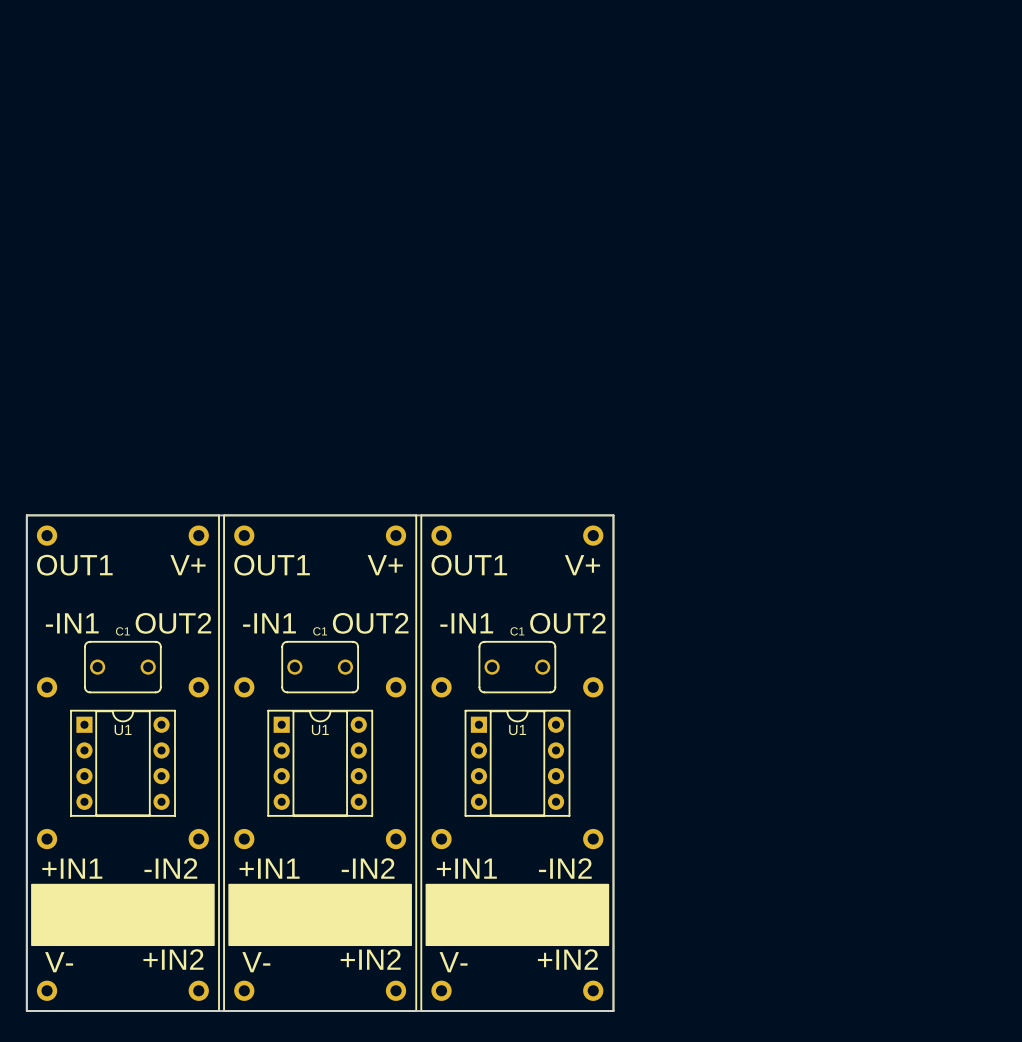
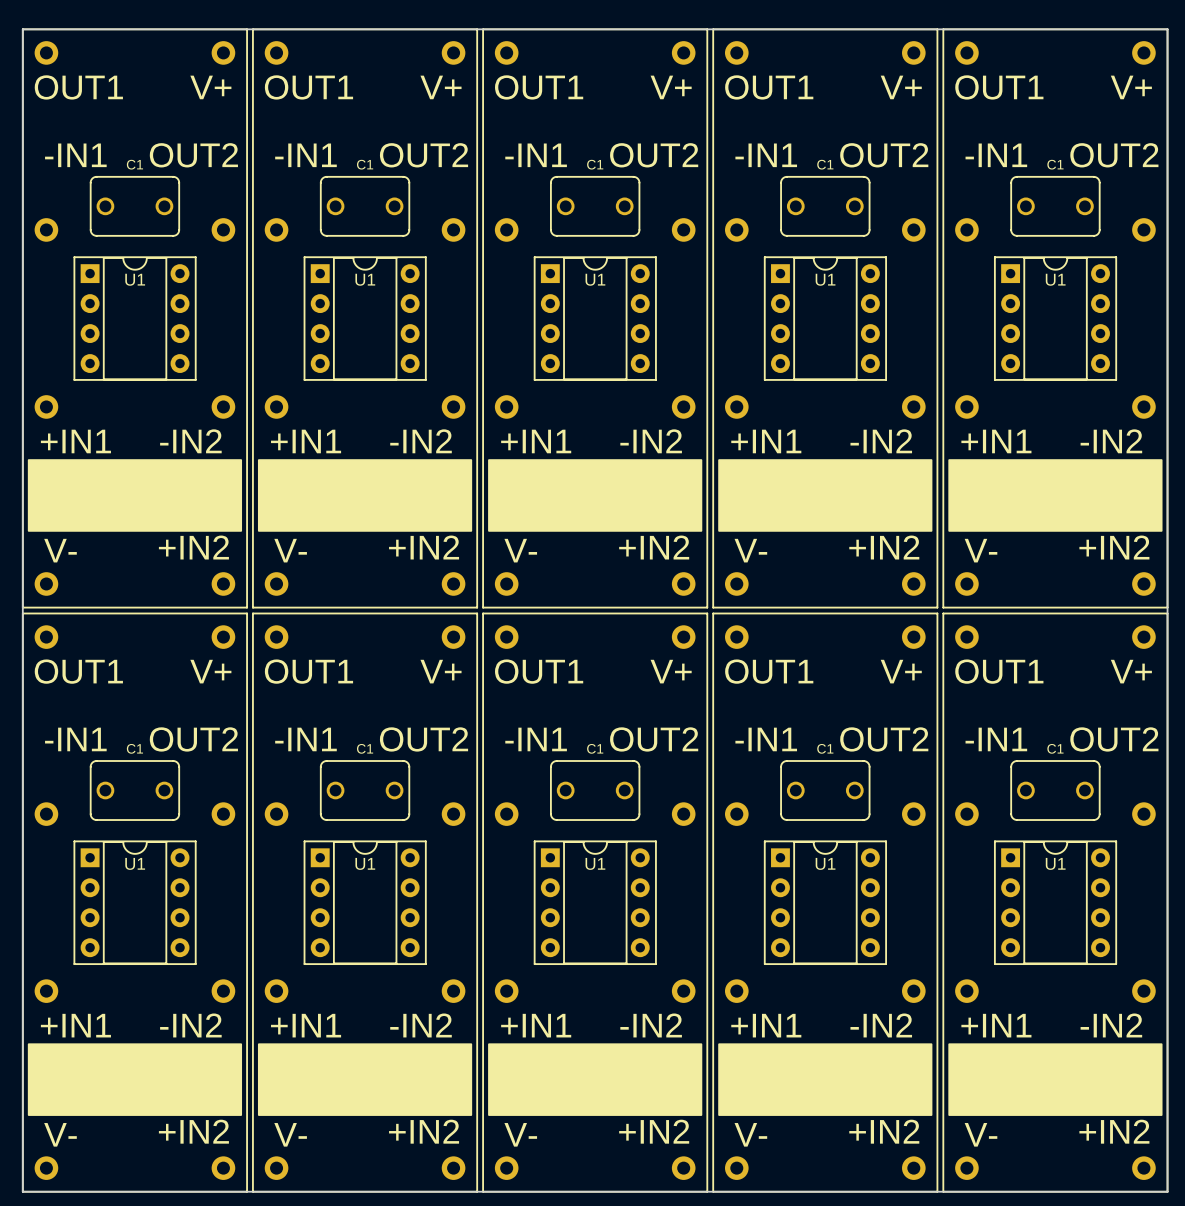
line: none -> (22, 29) (22, 607) (247, 607) (247, 29) (22, 29)
line: none -> (252, 29) (252, 607) (477, 607) (477, 29) (252, 29)
line: none -> (483, 29) (707, 29) (707, 607) (483, 607) (483, 29)
line: none -> (713, 29) (713, 607) (937, 607) (937, 29) (713, 29)
line: none -> (943, 29) (1167, 29) (1167, 607) (943, 607) (943, 29)
part: none -> OUT1 (46, 52)
part: none -> V+ (223, 52)
part: none -> OUT1 (276, 52)
part: none -> V+ (453, 52)
part: none -> OUT1 (506, 52)
part: none -> V+ (683, 52)
part: none -> OUT1 (736, 52)
part: none -> V+ (913, 52)
part: none -> OUT1 (966, 52)
part: none -> V+ (1143, 52)
C1: none -> (134, 206)
C1: none -> (365, 206)
C1: none -> (595, 206)
C1: none -> (825, 206)
C1: none -> (1055, 206)
part: none -> -IN1 (46, 229)
part: none -> OUT2 (223, 229)
part: none -> -IN1 (276, 229)
part: none -> OUT2 (453, 229)
part: none -> -IN1 (506, 229)
part: none -> OUT2 (683, 229)
part: none -> -IN1 (736, 229)
part: none -> OUT2 (913, 229)
part: none -> -IN1 (966, 229)
part: none -> OUT2 (1143, 229)
U1: none -> (135, 318)
U1: none -> (365, 318)
U1: none -> (595, 318)
U1: none -> (825, 318)
U1: none -> (1055, 318)
part: none -> +IN1 (46, 406)
part: none -> -IN2 (223, 406)
part: none -> +IN1 (276, 406)
part: none -> -IN2 (453, 406)
part: none -> +IN1 (506, 406)
part: none -> -IN2 (683, 406)
part: none -> +IN1 (736, 406)
part: none -> -IN2 (913, 406)
part: none -> +IN1 (966, 406)
part: none -> -IN2 (1143, 406)
drawing: none -> [27, 459, 243, 532]
drawing: none -> [257, 459, 473, 532]
drawing: none -> [488, 459, 703, 532]
drawing: none -> [718, 459, 933, 532]
drawing: none -> [948, 459, 1163, 532]
part: none -> V- (46, 583)
part: none -> +IN2 (223, 583)
part: none -> V- (276, 583)
part: none -> +IN2 (453, 583)
part: none -> V- (506, 583)
part: none -> +IN2 (683, 583)
part: none -> V- (736, 583)
part: none -> +IN2 (913, 583)
part: none -> V- (966, 583)
part: none -> +IN2 (1143, 583)
board edge: (26, 515) (613, 515) (613, 1011) -> (22, 613) (22, 29) (1167, 29) (1167, 1191) (707, 1191)
line: none -> (713, 613) (937, 613) (937, 1191) (713, 1191) (713, 613)
line: none -> (943, 613) (1167, 613) (1167, 1191) (943, 1191) (943, 613)
part: none -> OUT1 (736, 637)
part: none -> V+ (913, 637)
part: none -> OUT1 (966, 637)
part: none -> V+ (1143, 637)
C1: none -> (825, 790)
C1: none -> (1055, 790)
part: none -> -IN1 (736, 814)
part: none -> OUT2 (913, 814)
part: none -> -IN1 (966, 814)
part: none -> OUT2 (1143, 814)
U1: none -> (825, 902)
U1: none -> (1055, 902)
part: none -> +IN1 (736, 991)
part: none -> -IN2 (913, 991)
part: none -> +IN1 (966, 991)
part: none -> -IN2 (1143, 991)
drawing: none -> [718, 1043, 933, 1116]
drawing: none -> [948, 1043, 1163, 1116]
part: none -> V- (736, 1168)
part: none -> +IN2 (913, 1168)
part: none -> V- (966, 1168)
part: none -> +IN2 (1143, 1168)

